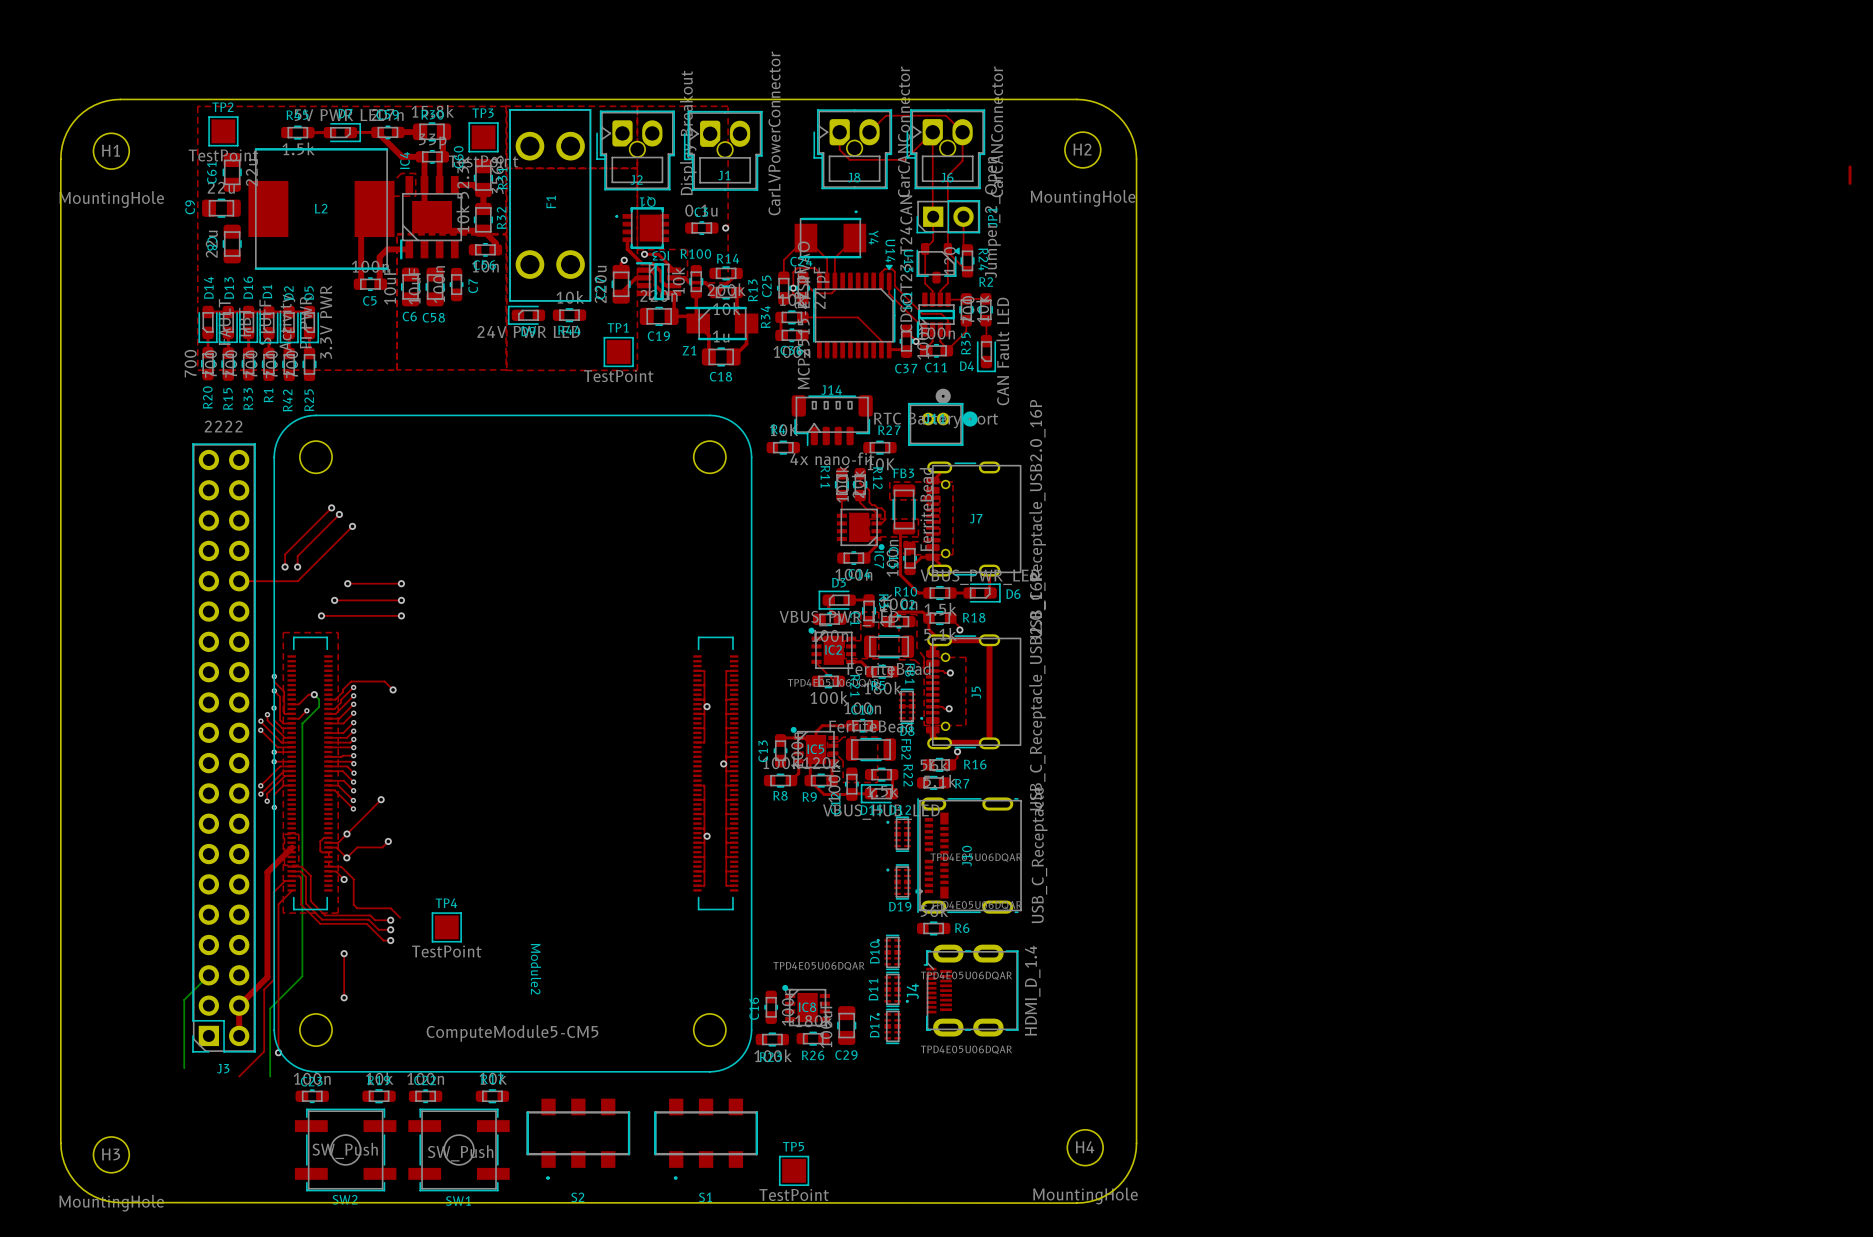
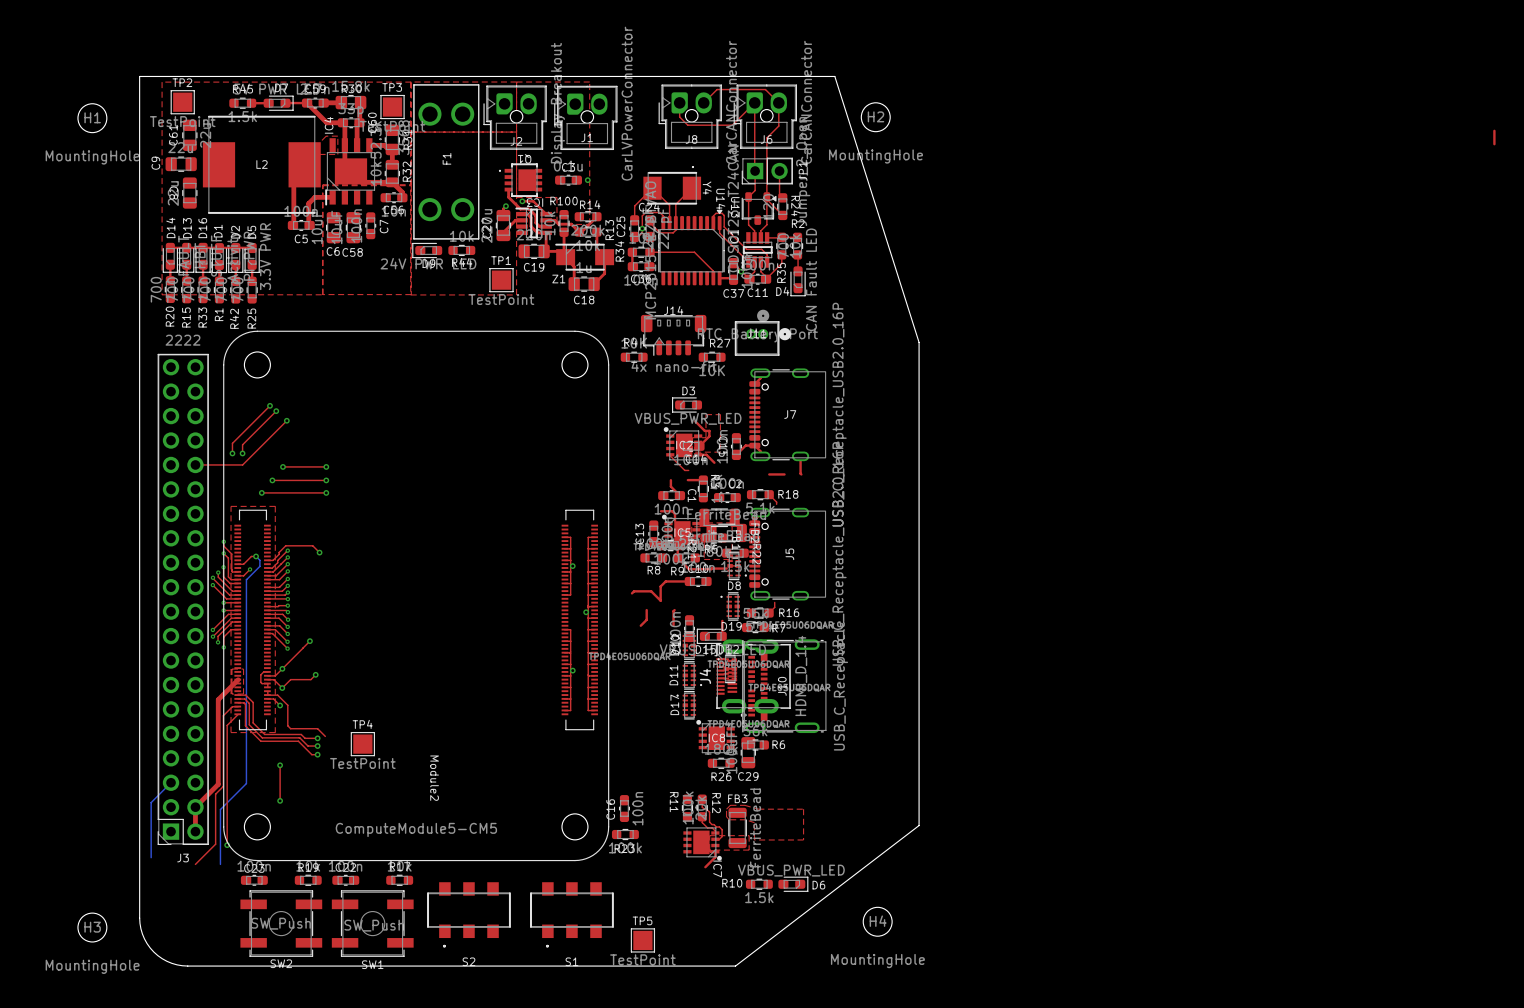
board edge: (169, 99) (113, 99) (94, 105) (83, 112) (73, 121) (66, 133) (61, 152) (60, 1143) (64, 1162) (78, 1185) (100, 1199) (120, 1202) (1083, 1202) (1102, 1197) (1114, 1190) (1127, 1175) (1133, 1163) (1136, 1143) (1136, 1028) -> (139, 76) (139, 918) (144, 938) (153, 952) (166, 961) (187, 966) (735, 966) (919, 825)
board edge: (1032, 99) (1076, 99) (1096, 102) (1119, 116) (1133, 139) (1136, 159) (1136, 429) -> (834, 76) (919, 342)
top track: (860, 473) (860, 483) (869, 490) (869, 502) (884, 511) (884, 520) (881, 523) (876, 523) -> none
top zone outline: (889, 482) (953, 482) (953, 554) (904, 554) (904, 541) (939, 541) (939, 496) (924, 496) (924, 499) (889, 499) (889, 482) -> none
R11 position: (841, 484) -> (687, 807)
R12 position: (860, 484) -> (702, 807)
top track: (841, 495) (841, 515) -> none
top track: (860, 495) (860, 502) (866, 509) (872, 509) (876, 515) -> none
FB3 position: (904, 509) -> (737, 827)
top zone outline: (869, 519) (869, 536) (918, 536) (918, 519) (869, 519) -> none
top track: (904, 528) (900, 531) (900, 575) (918, 593) (929, 593) -> none
IC7 position: (860, 529) -> (702, 844)
R10 position: (939, 593) -> (759, 884)
D6 position: (982, 593) -> (793, 884)
D3 position: (837, 600) -> (687, 405)
top zone outline: (860, 612) (860, 640) (844, 640) (844, 658) (878, 658) (878, 612) (860, 612) -> (705, 414) (705, 437) (692, 437) (692, 452) (720, 452) (720, 414) (705, 414)
top track: (888, 621) (898, 612) (922, 612) (928, 618) (928, 629) (939, 640) (989, 640) (989, 743) (939, 743) (932, 736) (932, 730) -> none
via: (959, 630) -> none
IC2 position: (832, 648) -> (683, 443)
top zone outline: (924, 657) (965, 657) (965, 725) (924, 725) (924, 657) -> none
top zone outline: (924, 657) (916, 647) (916, 614) (899, 614) (899, 659) (914, 659) (924, 668) -> none
top track: (816, 661) (834, 681) (839, 681) -> (670, 454) (684, 470) (688, 470)
top track: (851, 661) (861, 661) (871, 671) -> (698, 454) (706, 454) (714, 462)
top track: (932, 670) (950, 672) -> none
via: (950, 672) -> none
top track: (932, 706) (949, 708) -> none
via: (949, 708) -> none
top zone outline: (843, 737) (877, 737) (877, 782) (843, 782) (843, 761) (838, 756) (827, 756) (827, 741) (838, 741) (843, 737) -> (704, 522) (732, 522) (732, 559) (704, 559) (704, 542) (700, 538) (691, 538) (691, 526) (700, 526) (704, 522)
IC5 position: (814, 747) -> (681, 531)
top track: (816, 749) (810, 755) (810, 780) (824, 794) (870, 793) -> (682, 532) (677, 537) (677, 557) (688, 569) (726, 568)
FB2 position: (870, 749) -> (726, 532)
C13 position: (780, 750) -> (653, 533)
via: (957, 751) -> none
R22 position: (881, 774) -> (735, 553)
R8 position: (780, 780) -> (653, 557)
R9 position: (821, 780) -> (686, 557)
D19 position: (898, 881) -> (730, 606)
D10 position: (889, 952) -> (686, 645)
D11 position: (896, 989) -> (692, 675)
J4 position: (971, 990) -> (752, 676)
top track: none -> (702, 799) (702, 807) (709, 812) (709, 822) (722, 829) (722, 836) (719, 839) (715, 839)
top zone outline: none -> (730, 805) (726, 809) (726, 816) (729, 819) (745, 819) (754, 822) (754, 839) (803, 839) (803, 809) (758, 809) (744, 805) (730, 805)
IC8 position: (806, 1005) -> (715, 736)
top track: none -> (702, 816) (702, 822) (707, 827) (712, 827) (715, 833)
C29 position: (846, 1025) -> (748, 752)
D17 position: (889, 1026) -> (686, 705)
R26 position: (813, 1038) -> (721, 763)
top zone outline: none -> (709, 835) (709, 850) (749, 850) (749, 835) (709, 835)
top track: none -> (701, 842) (710, 851) (715, 851) (715, 857) (705, 867)

